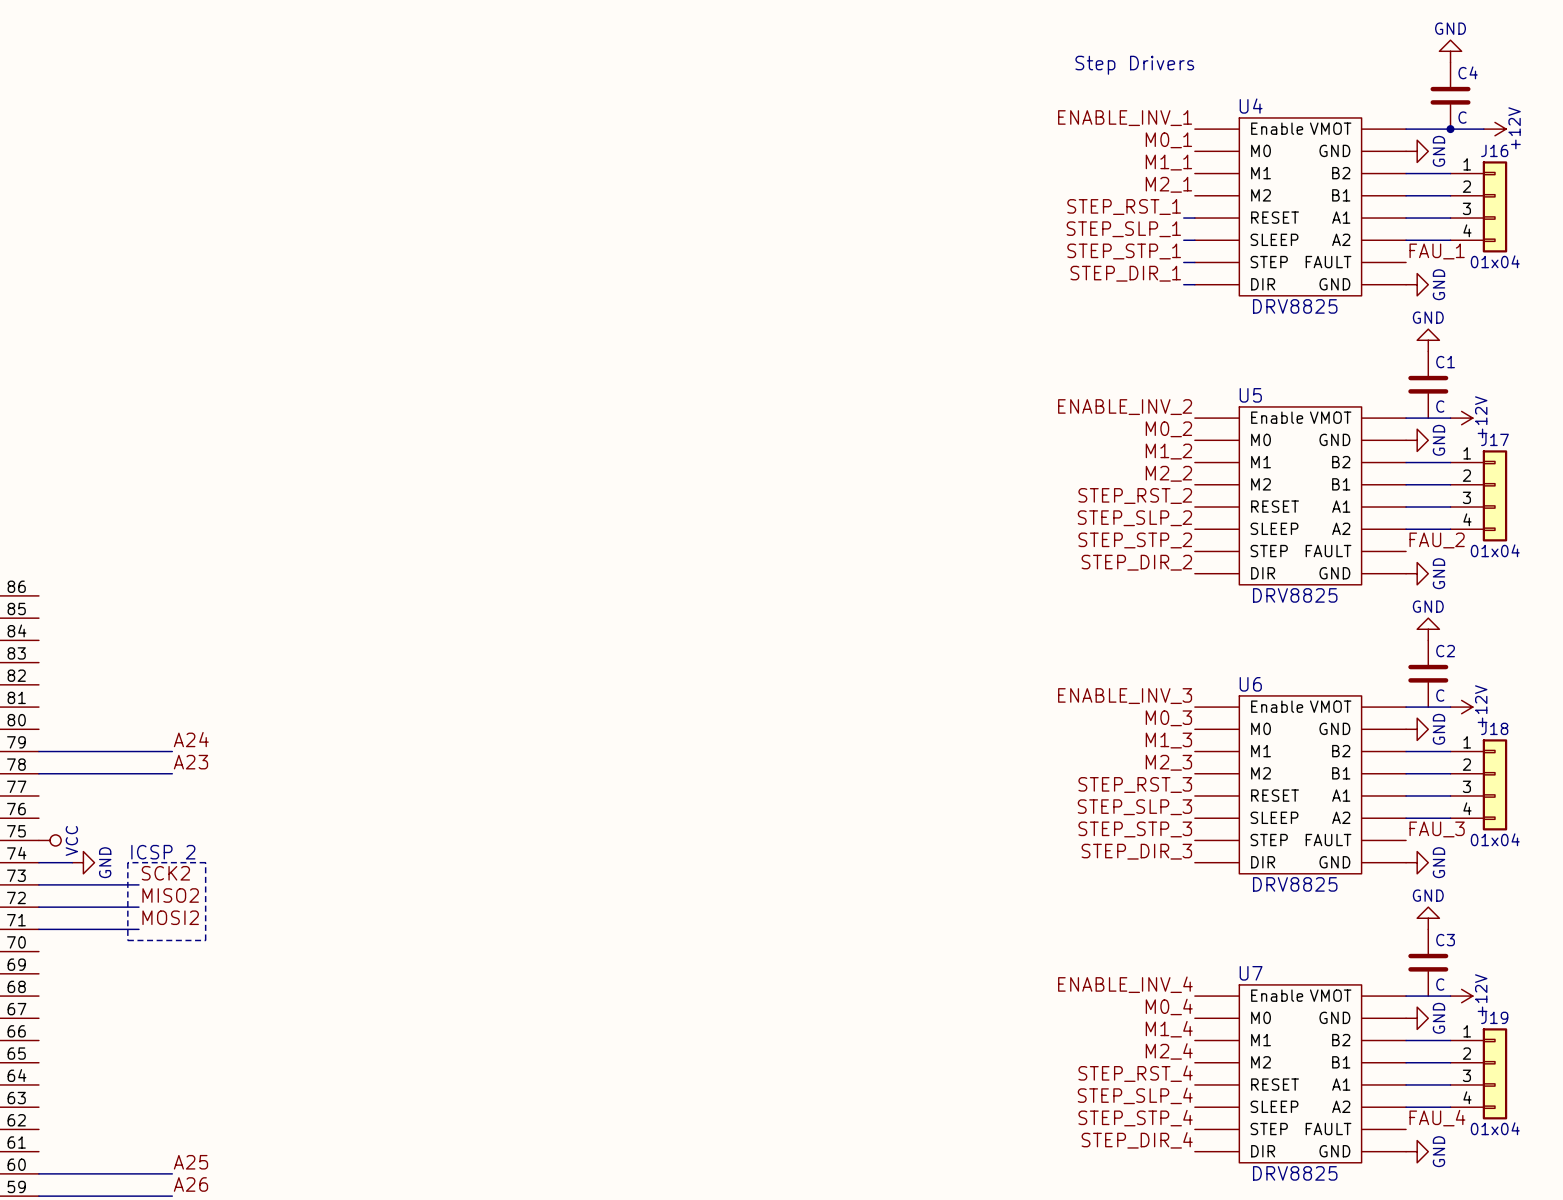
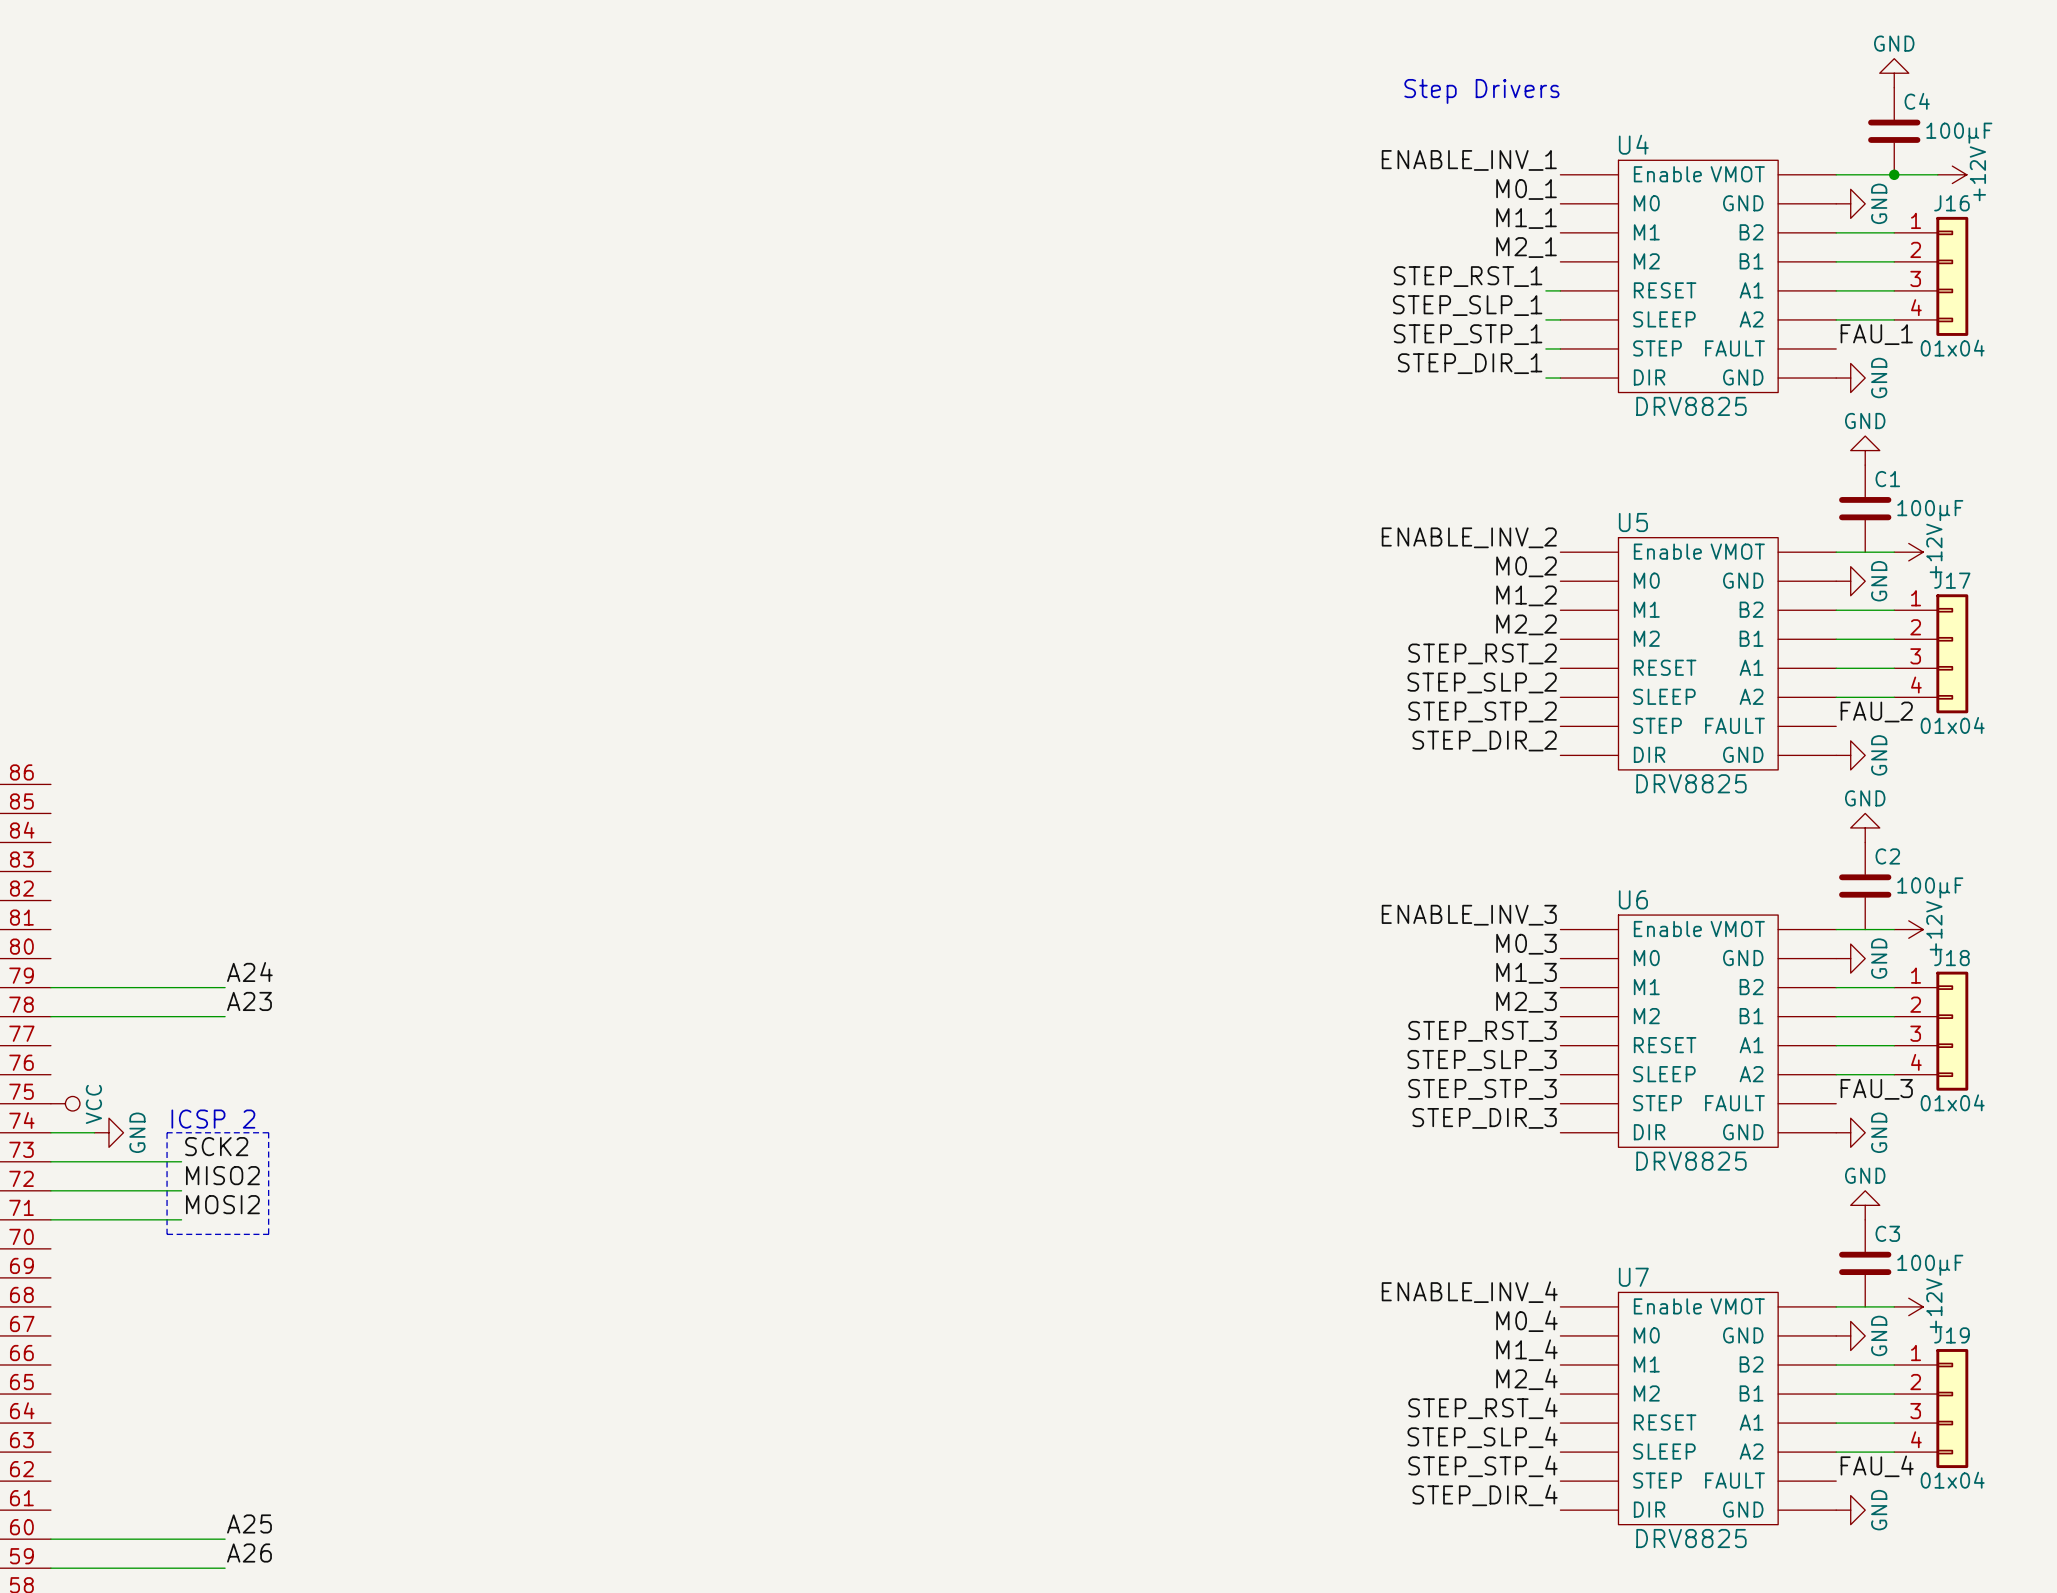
C4 value: C (1462, 117) -> 100µF (1959, 133)
C1 value: C (1440, 406) -> 100µF (1930, 510)
C2 value: C (1440, 695) -> 100µF (1930, 887)
C3 value: C (1440, 984) -> 100µF (1930, 1265)

